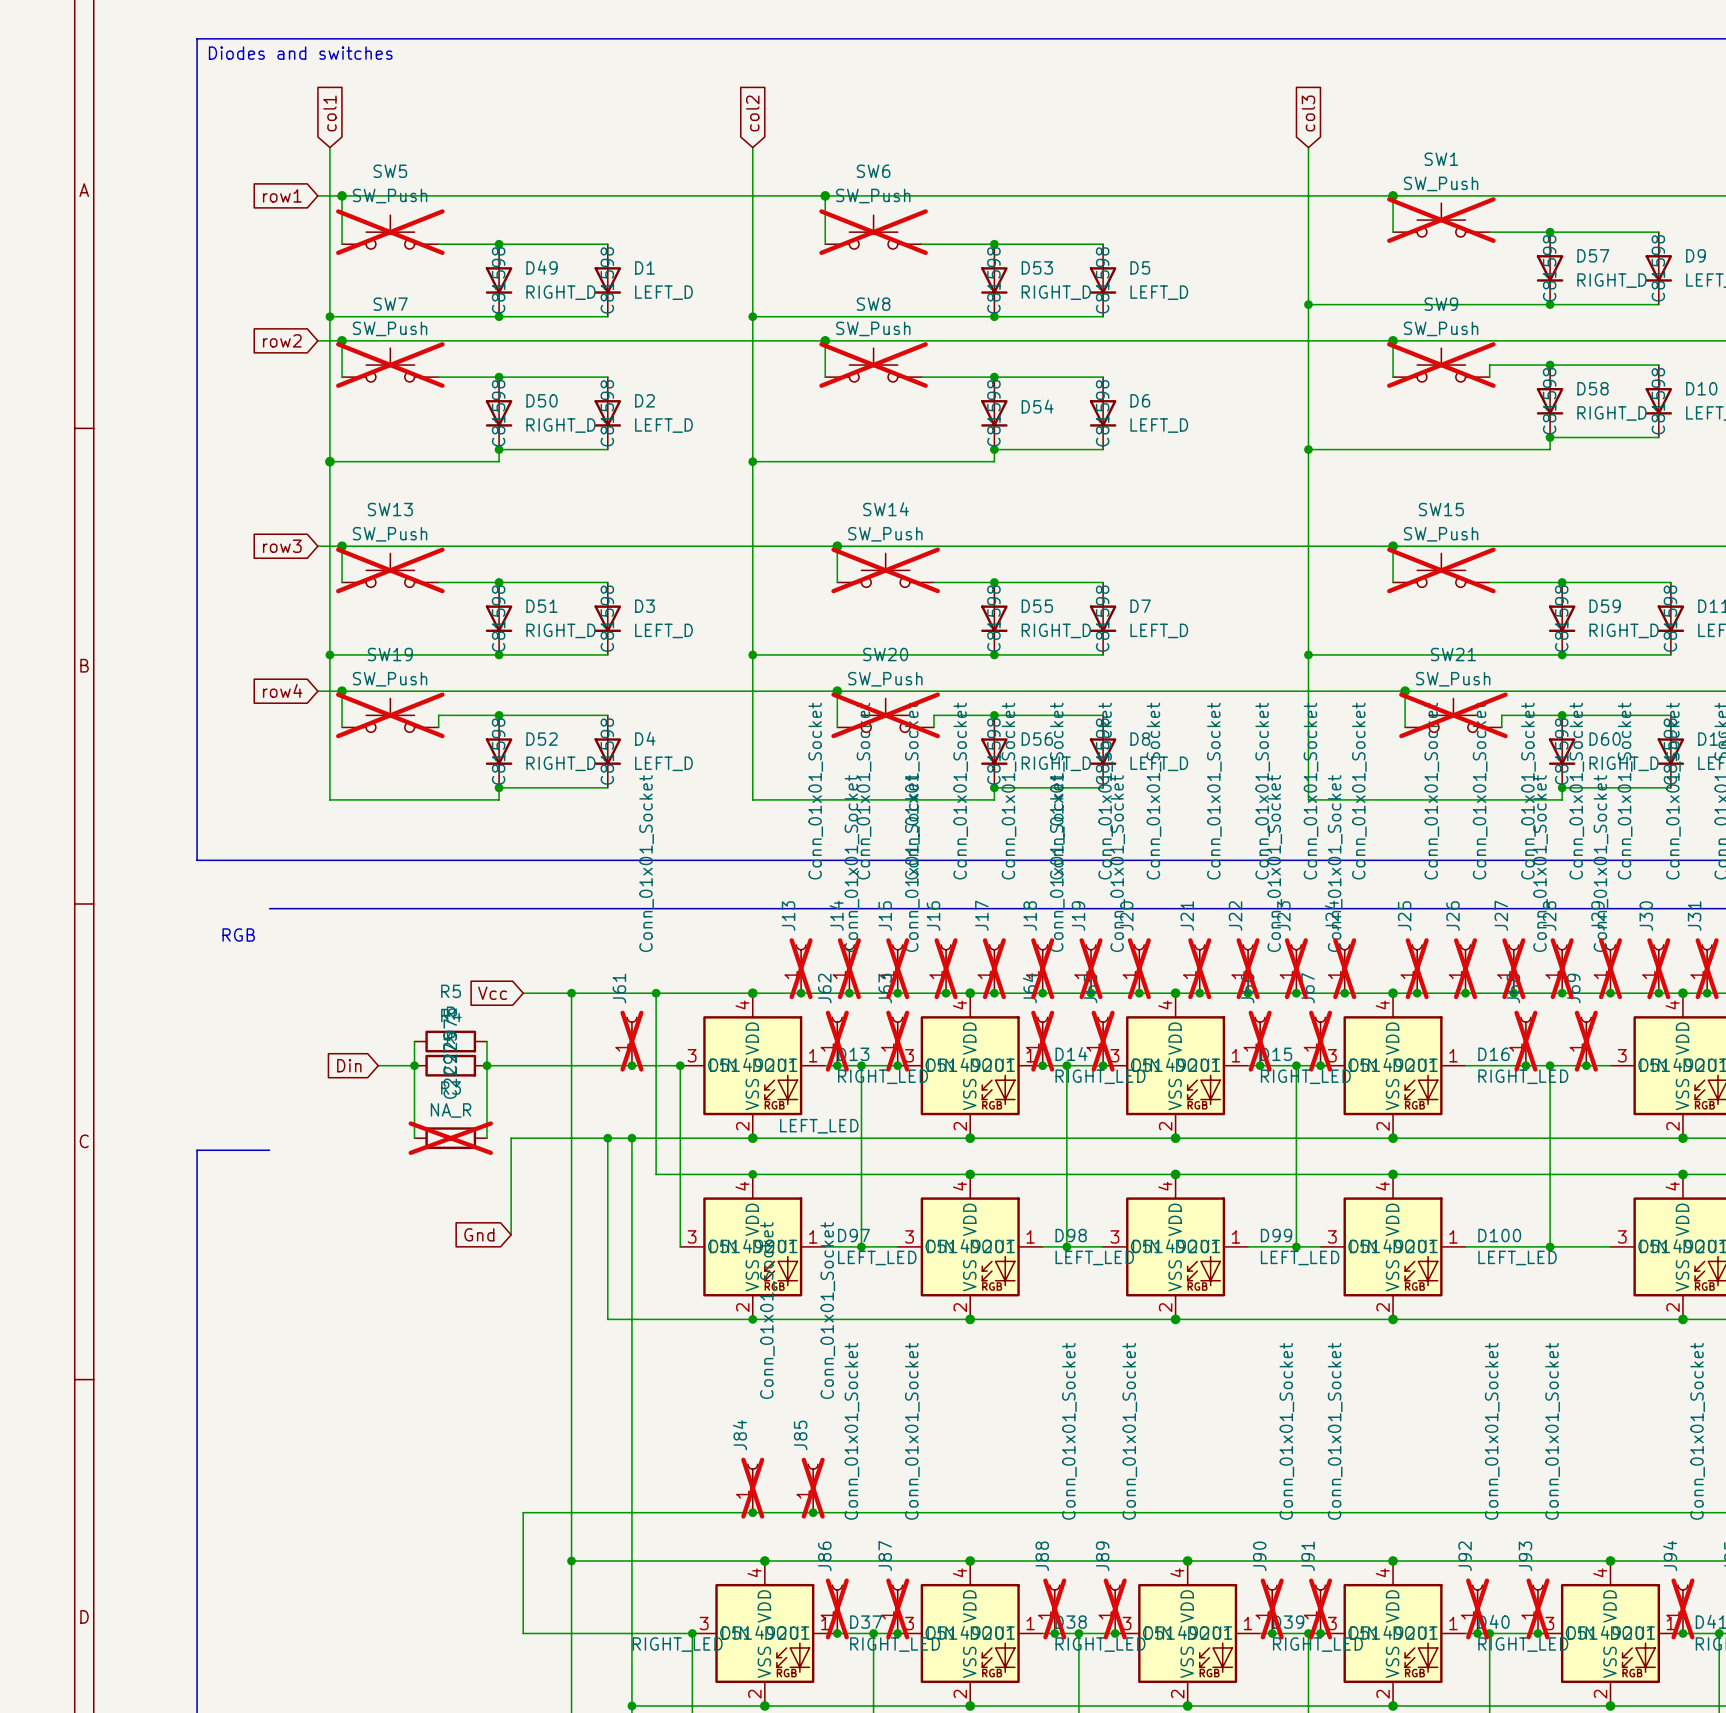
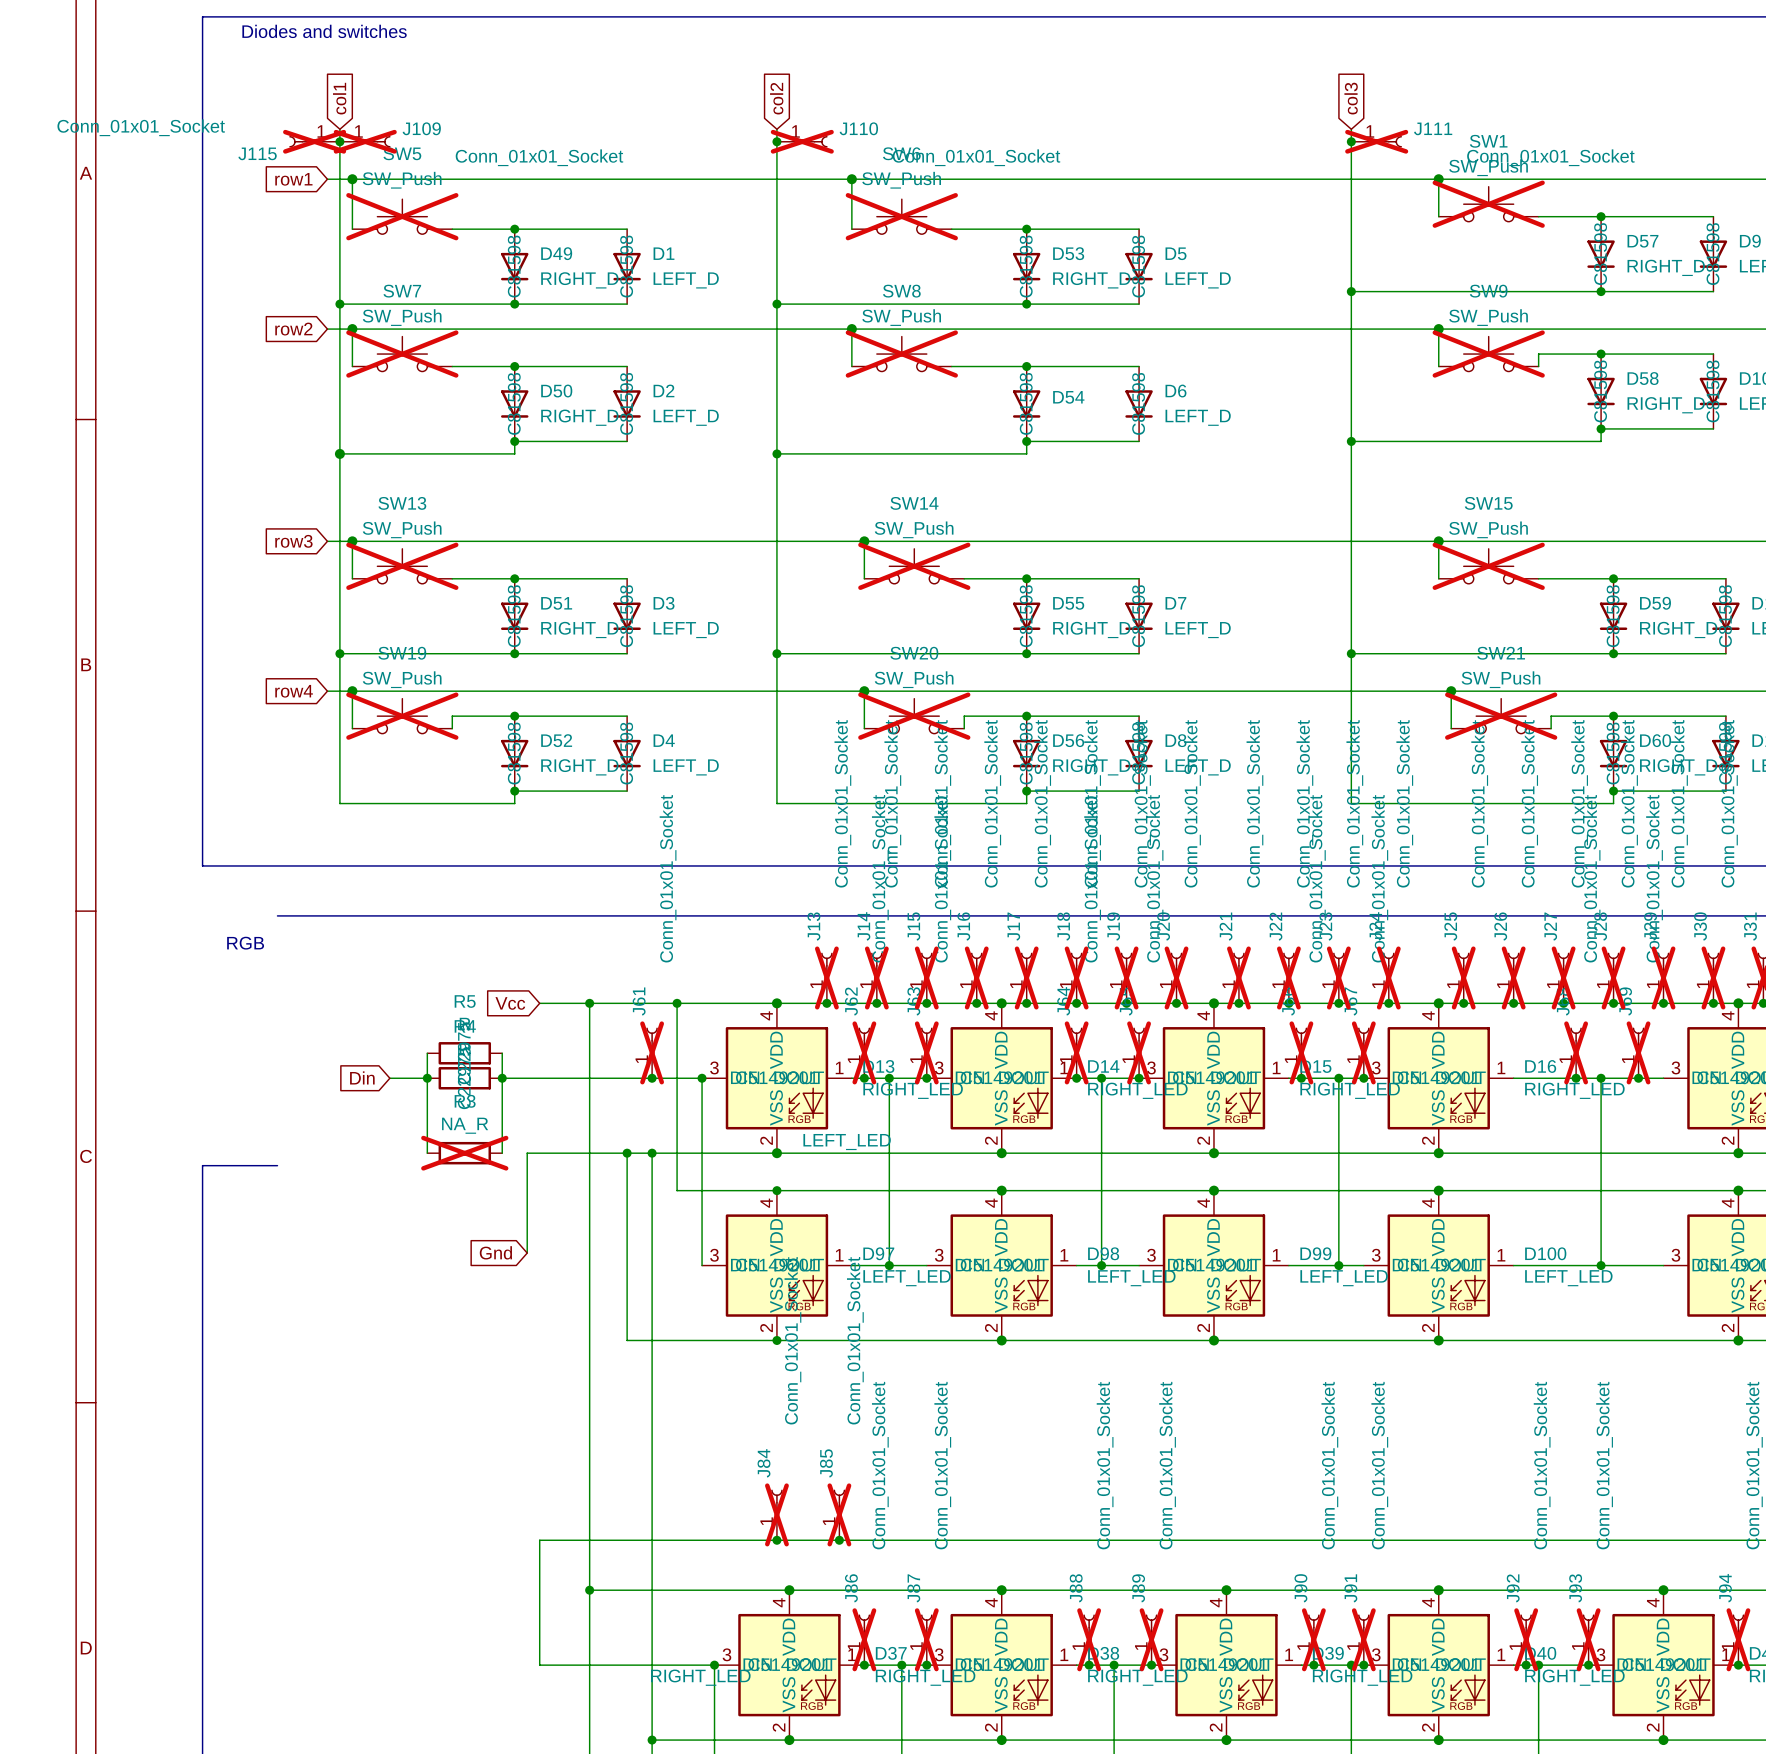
J115: none -> Conn_01x01_Socket (314, 141)
junction: none -> (339, 141)
J109: none -> Conn_01x01_Socket (365, 141)
junction: none -> (776, 141)
J110: none -> Conn_01x01_Socket (802, 141)
junction: none -> (1351, 141)
J111: none -> Conn_01x01_Socket (1376, 141)

